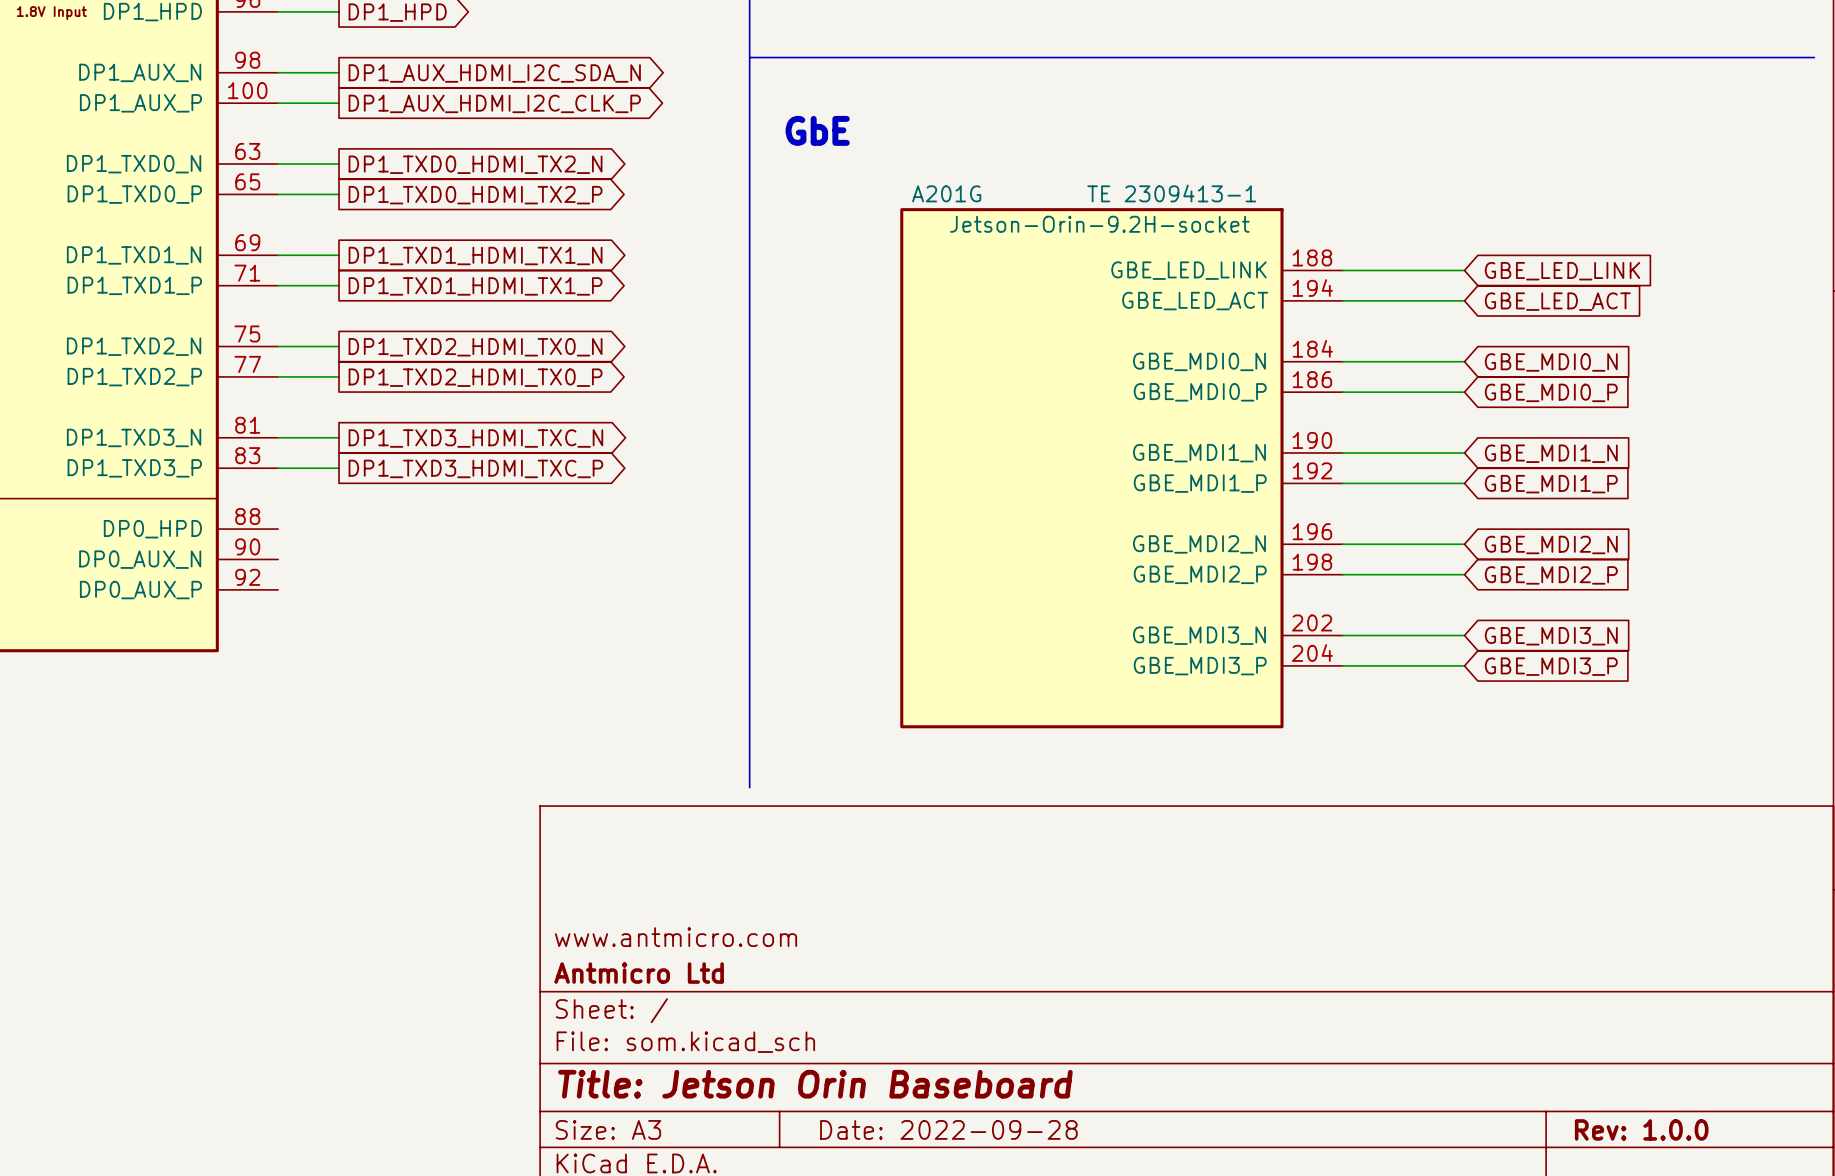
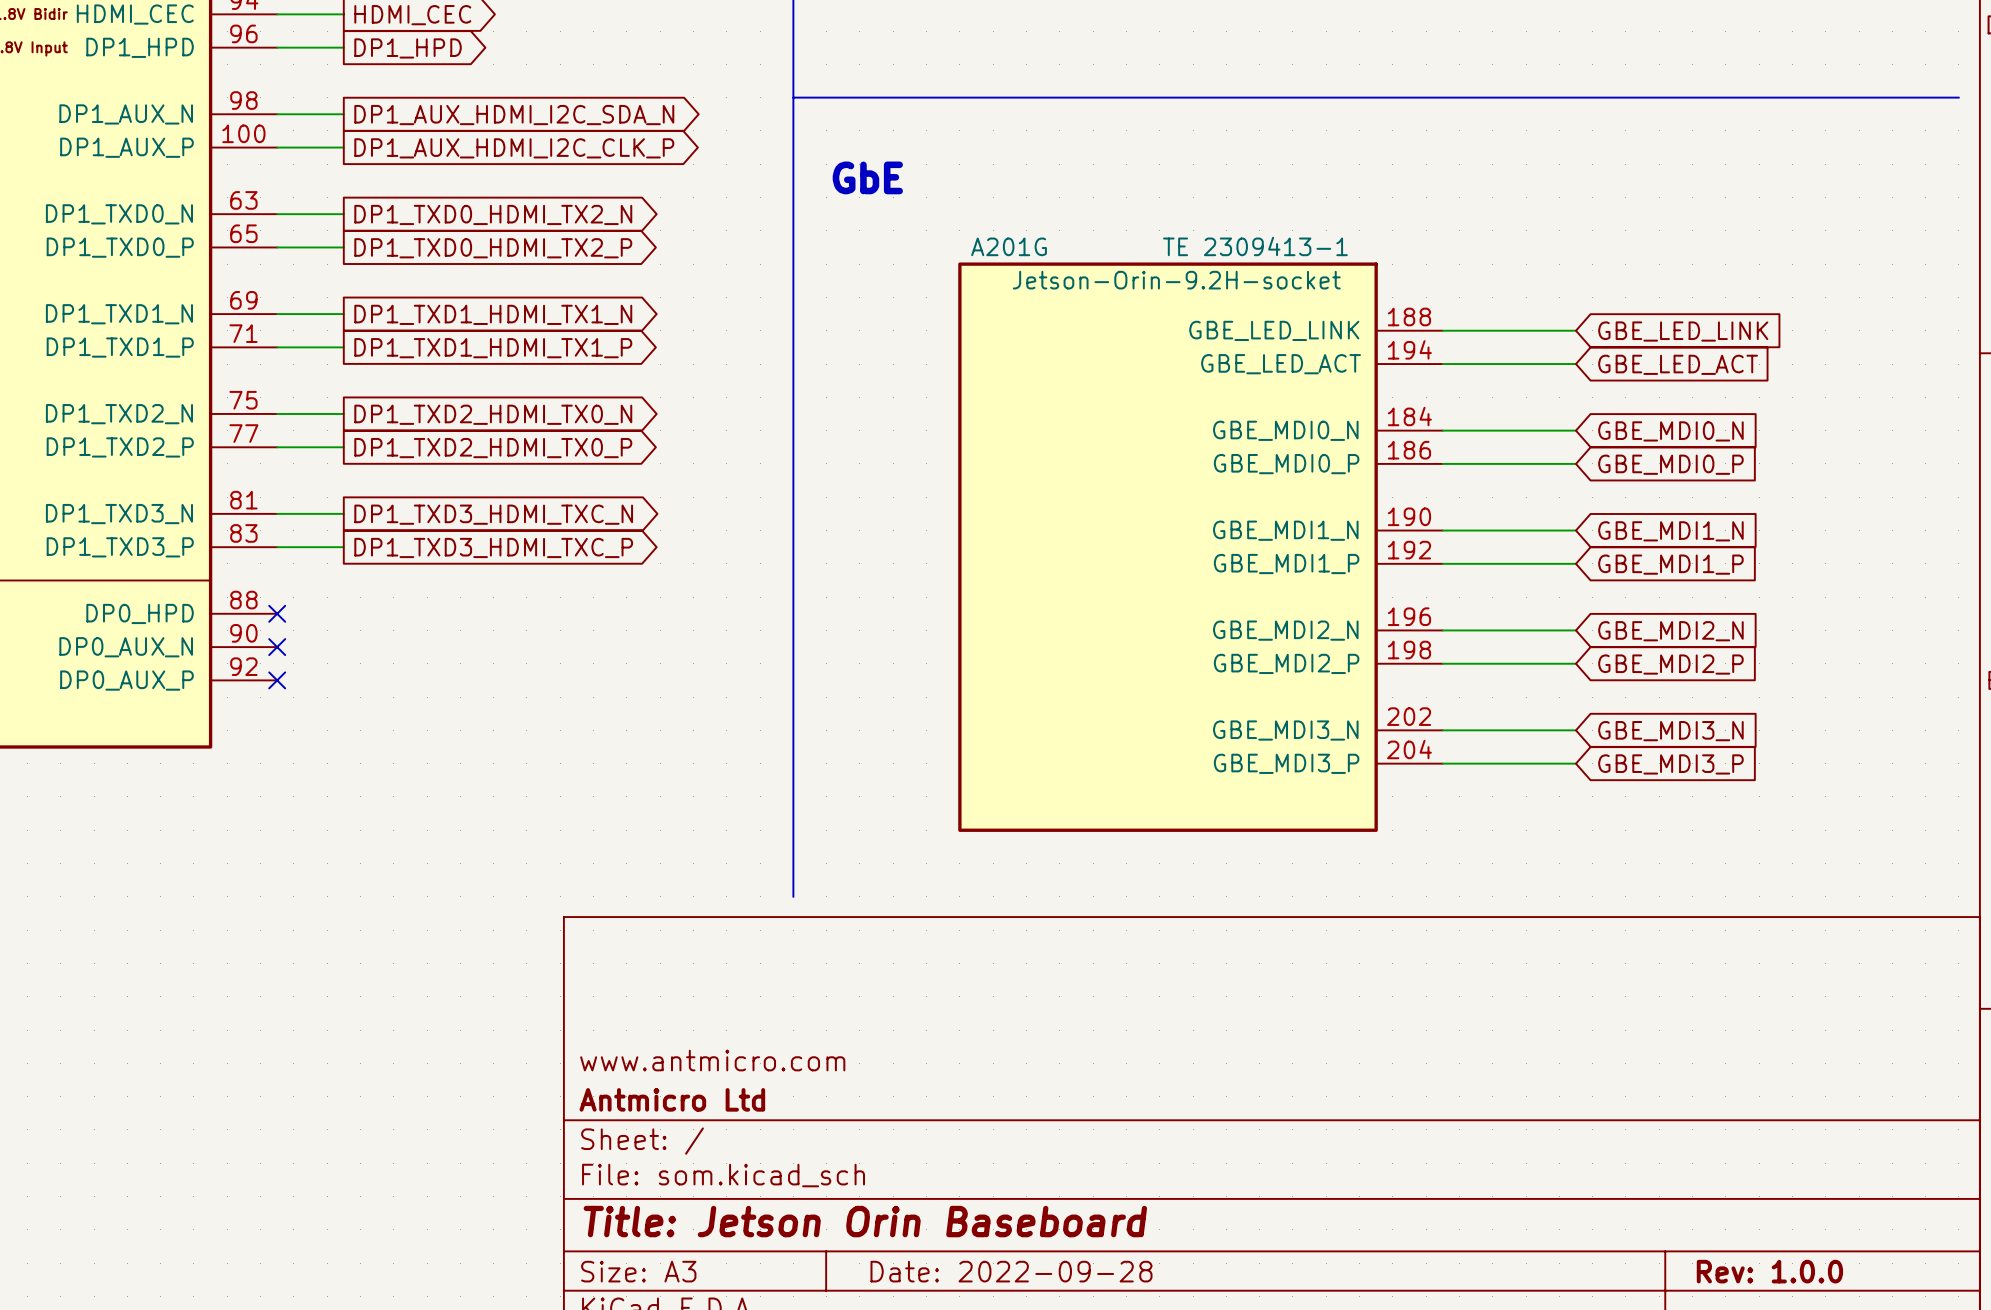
no-connect mark: none -> (277, 613)
no-connect mark: none -> (277, 647)
no-connect mark: none -> (277, 680)

